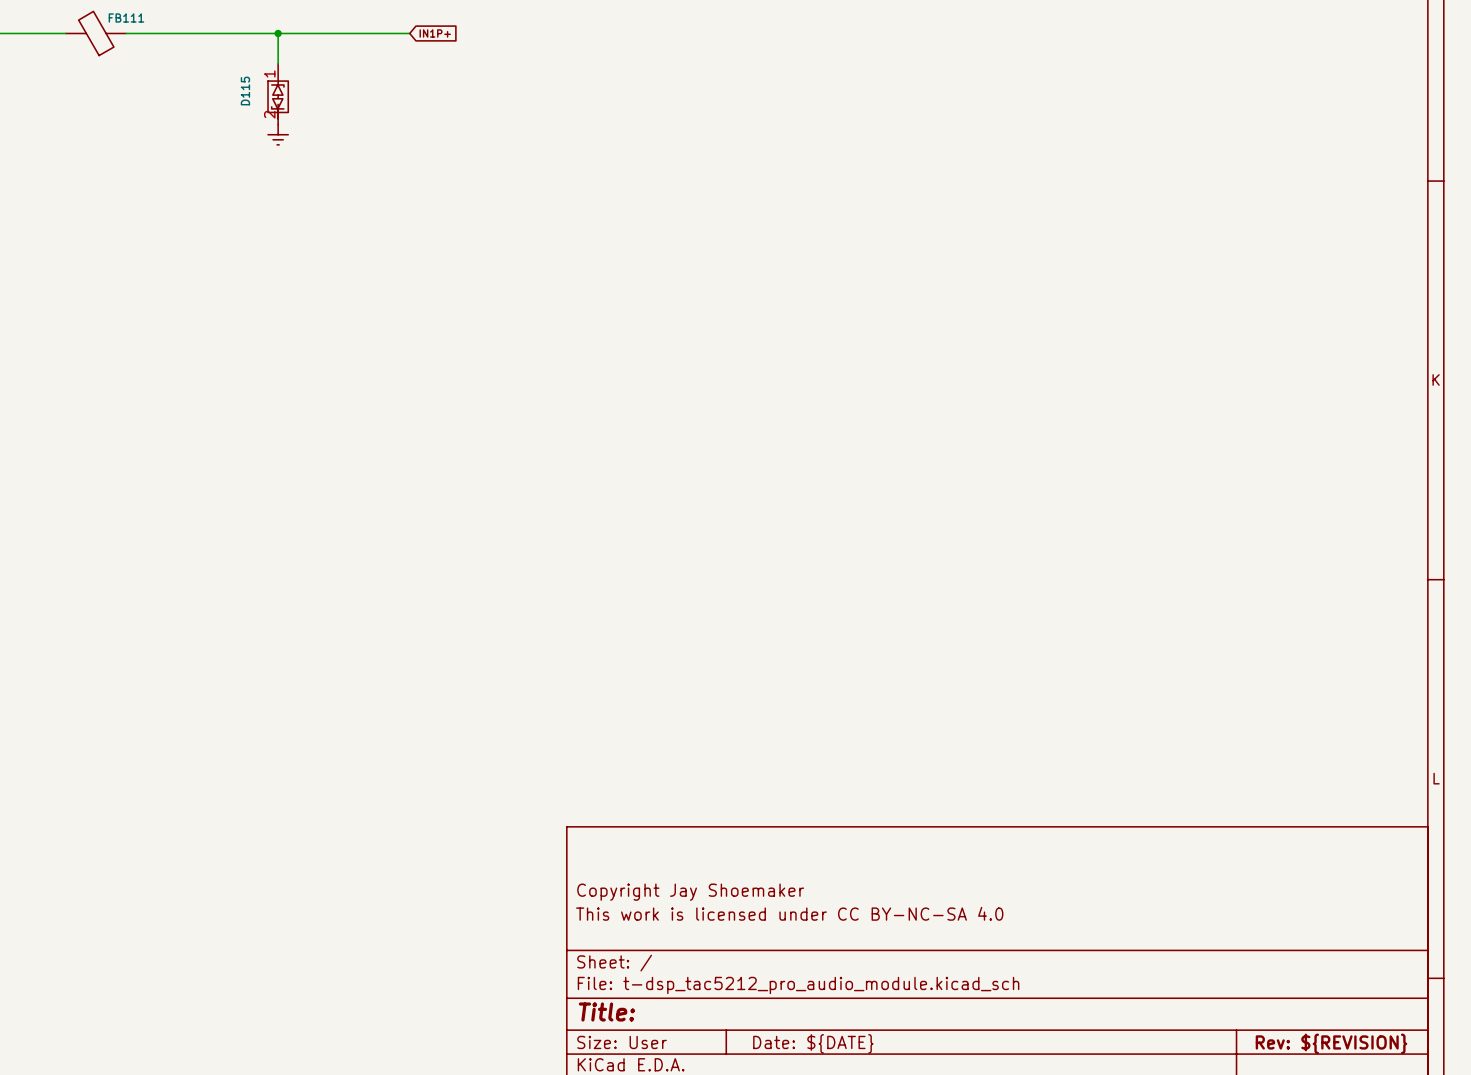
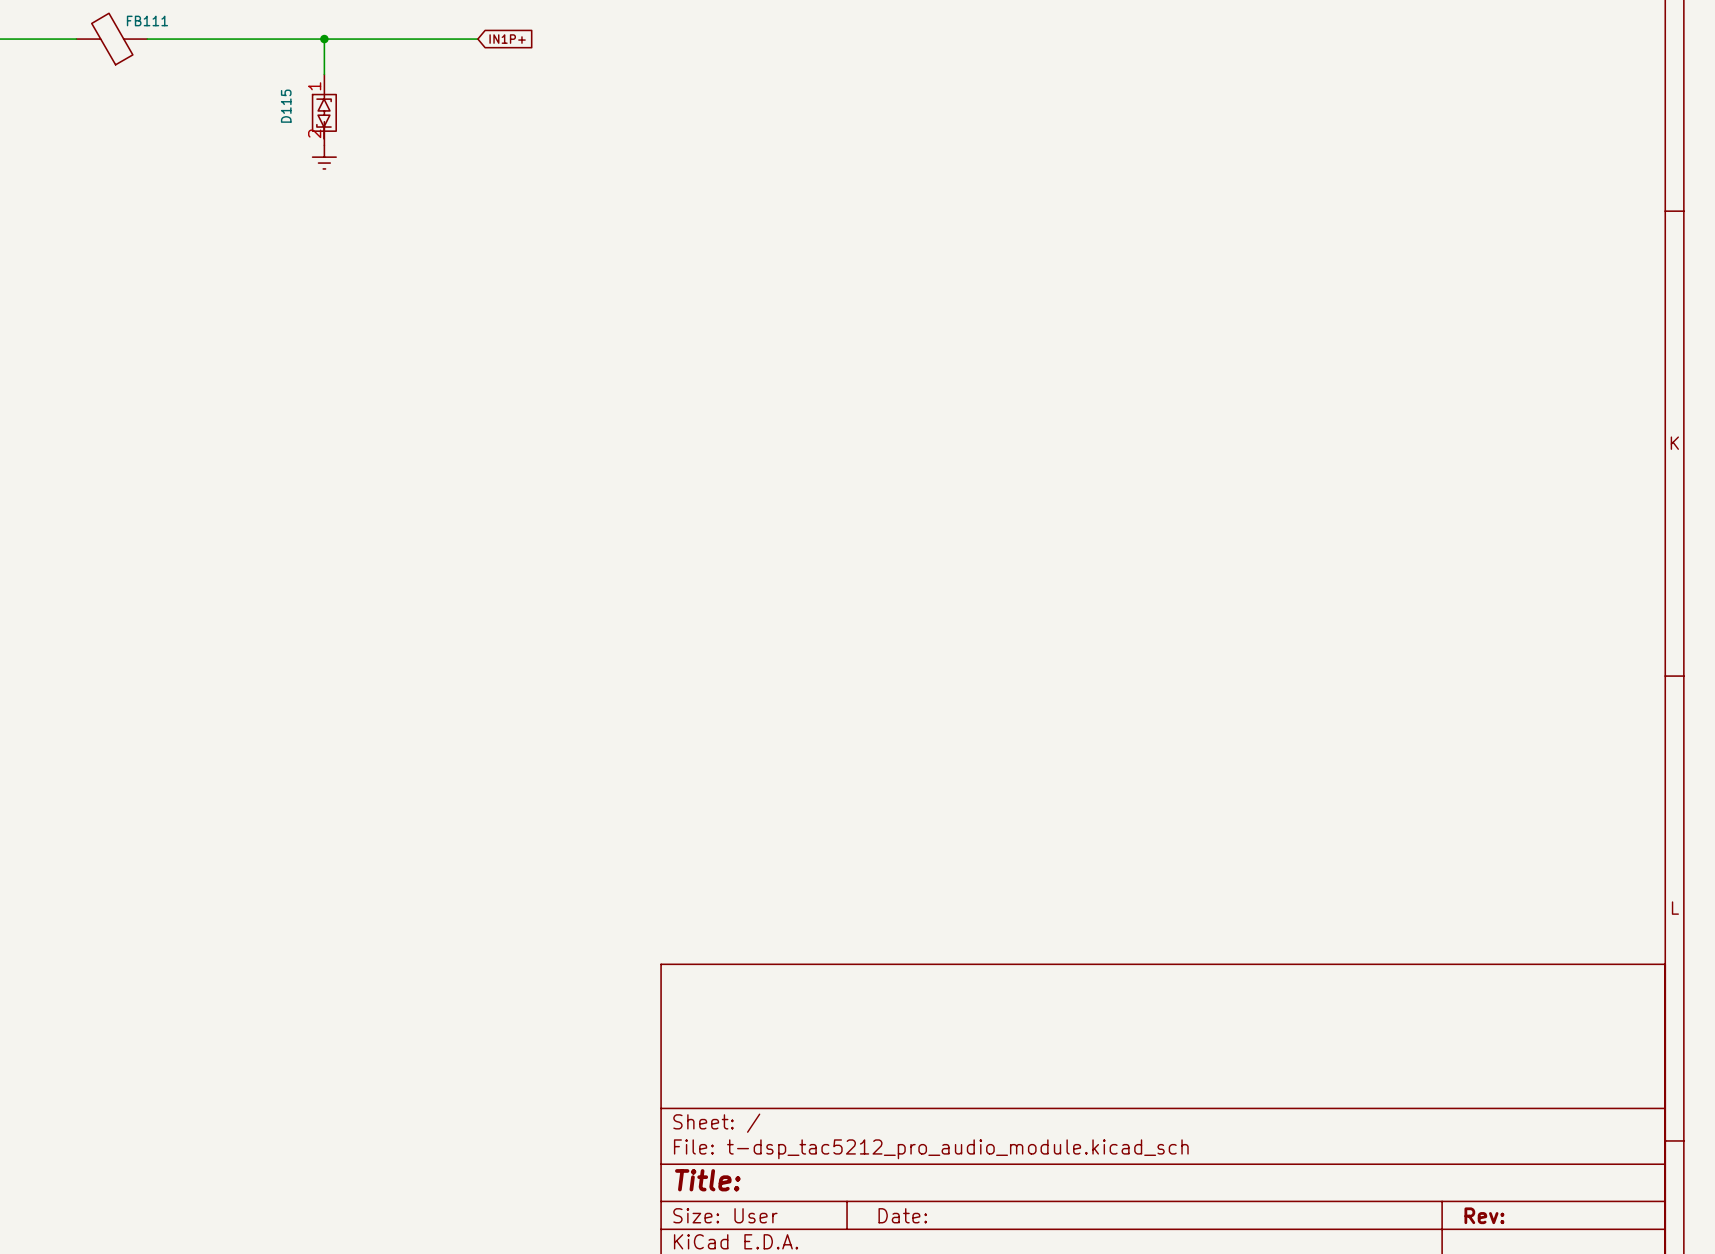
title block: Copyright Jay Shoemaker (690, 892) -> none
title block: This work is licensed under CC BY-NC-SA 4.0 (789, 913) -> none
title block: Date: ${DATE} (813, 1043) -> Date: (902, 1215)
title block: Rev: ${REVISION} (1331, 1043) -> Rev: (1484, 1215)

